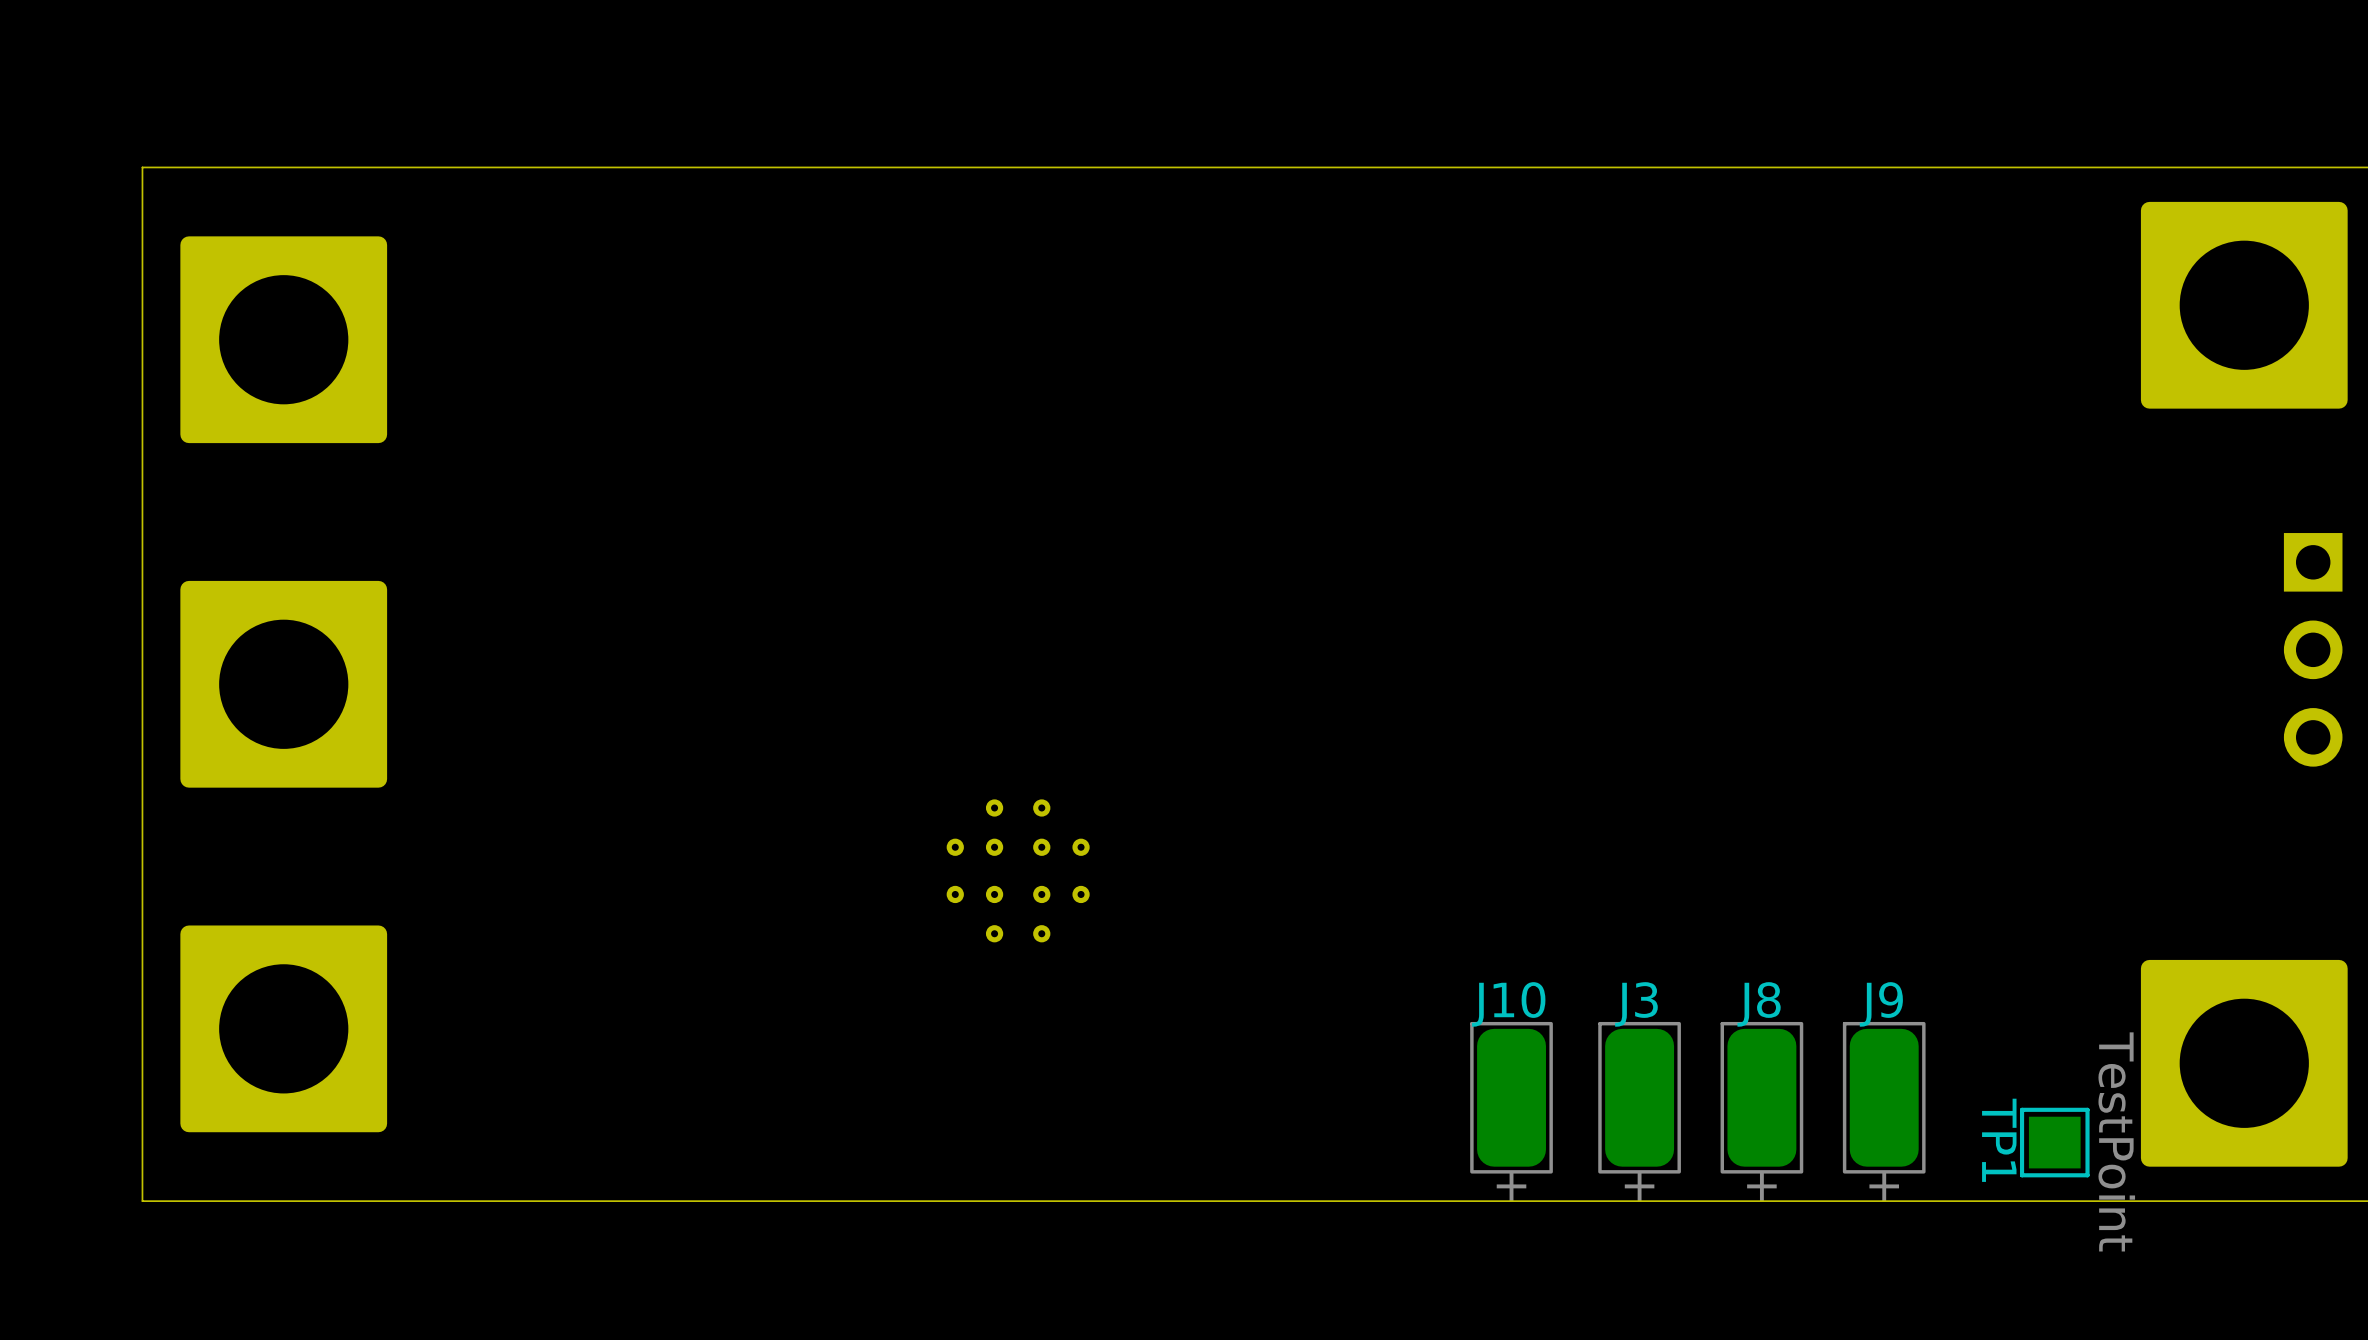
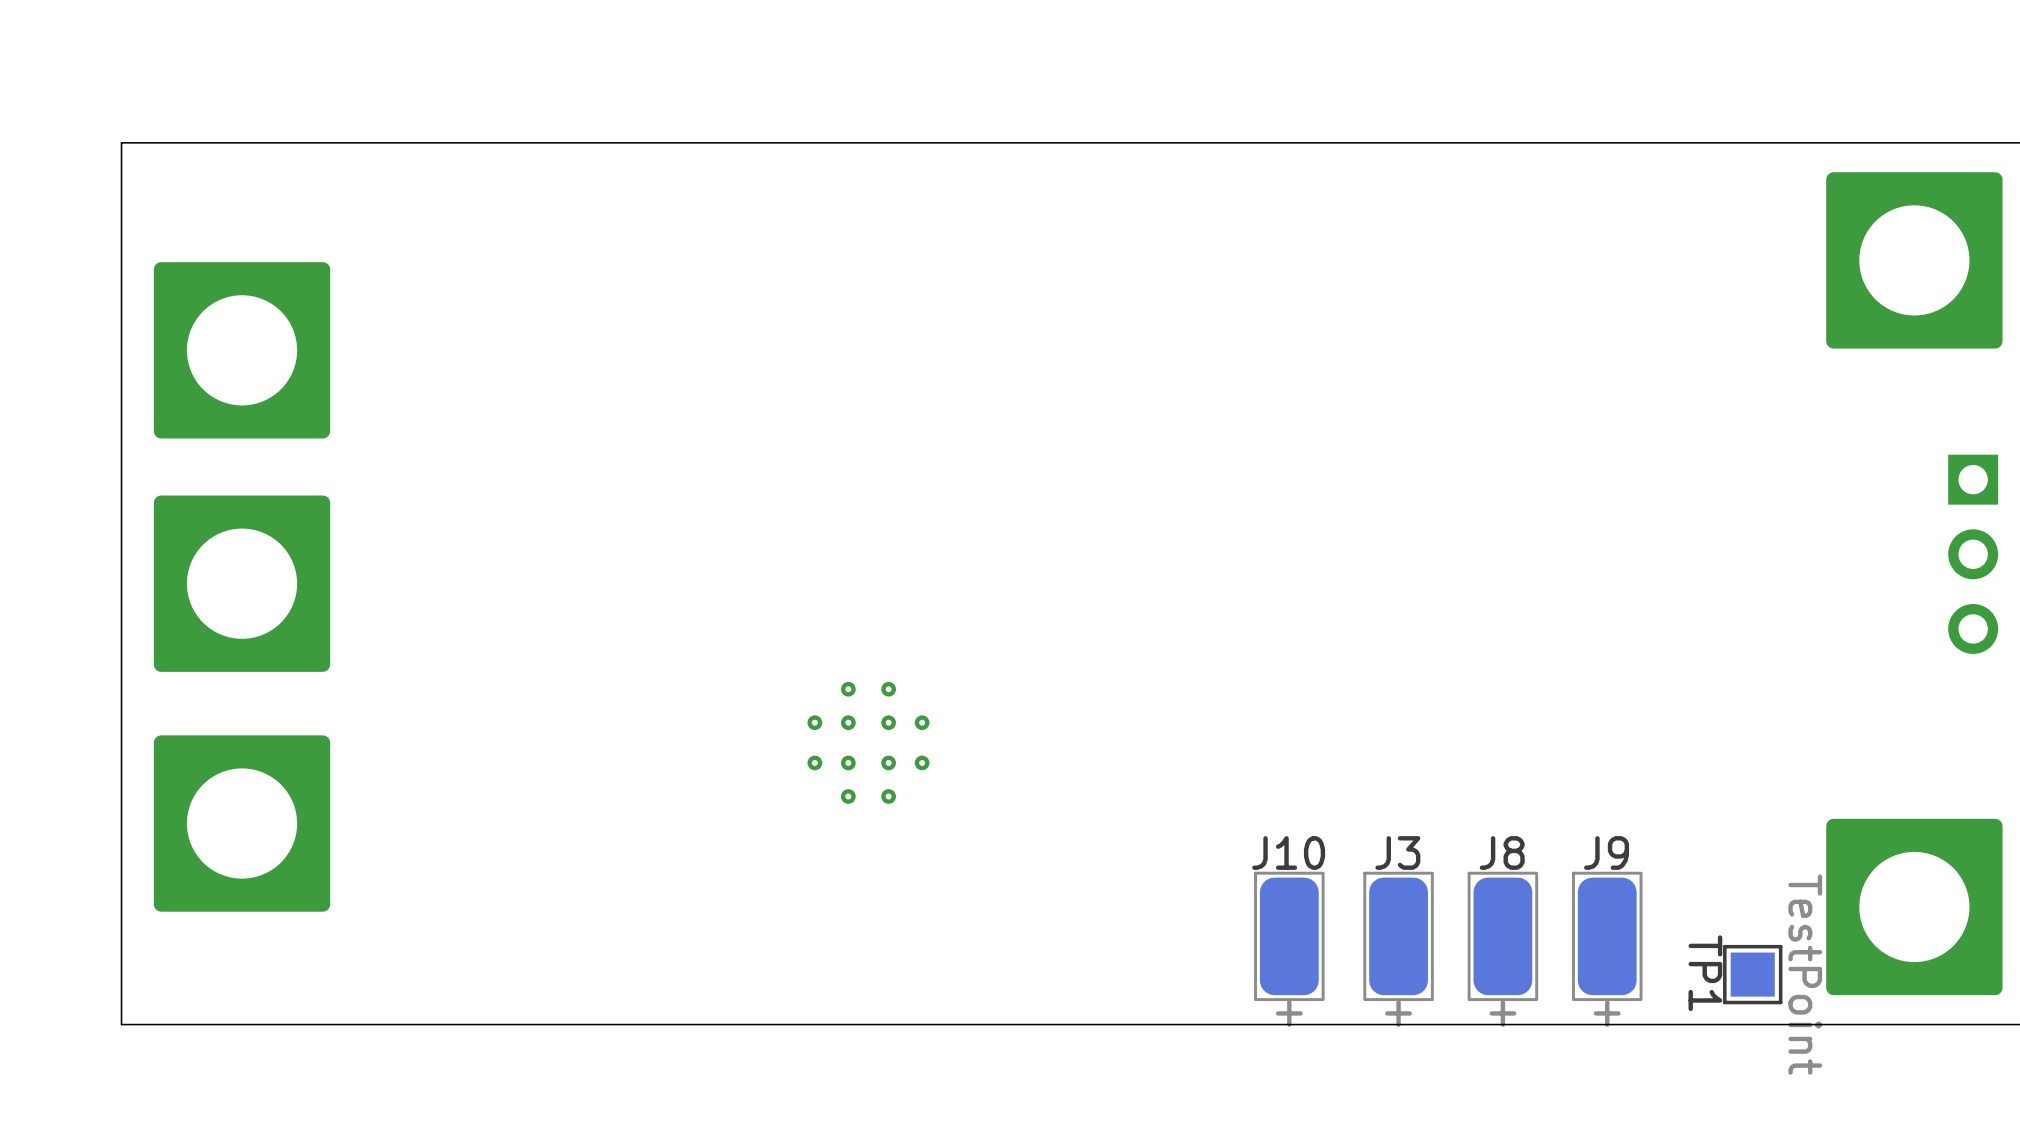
part position: (283, 339) -> (242, 350)
part position: (283, 1028) -> (242, 823)

